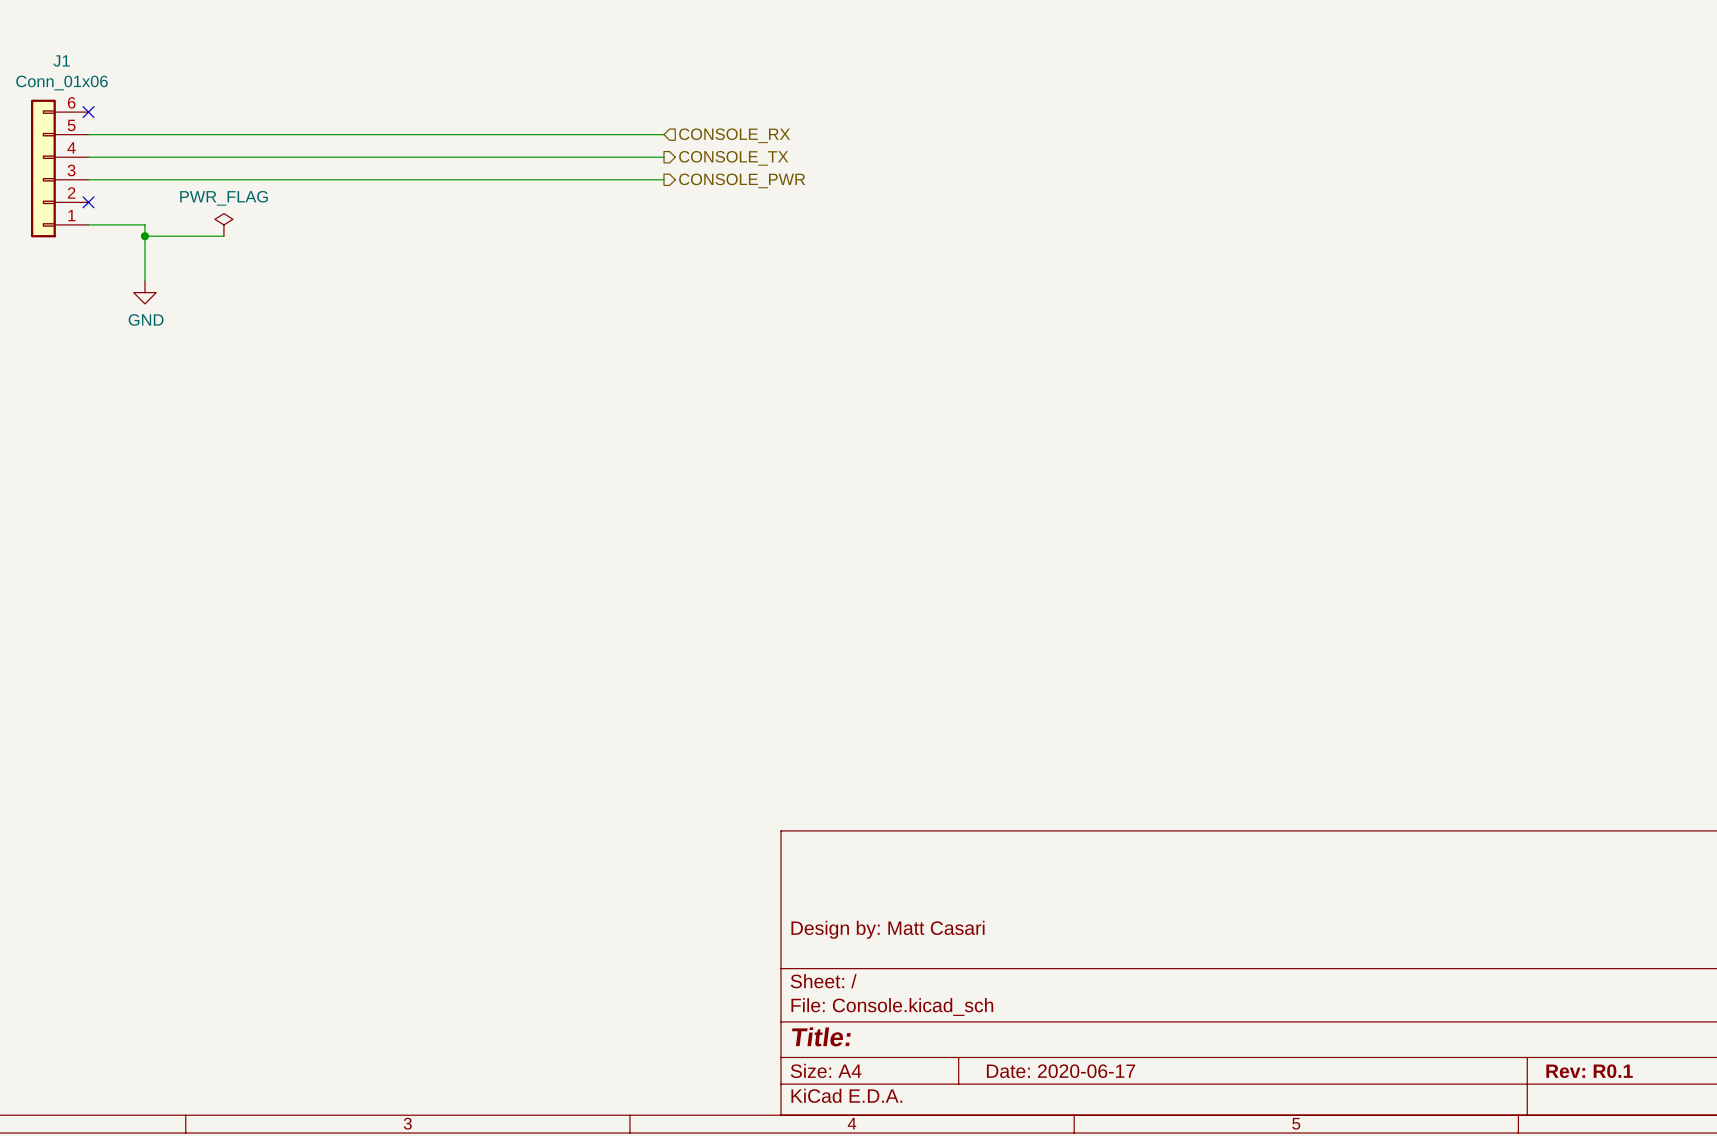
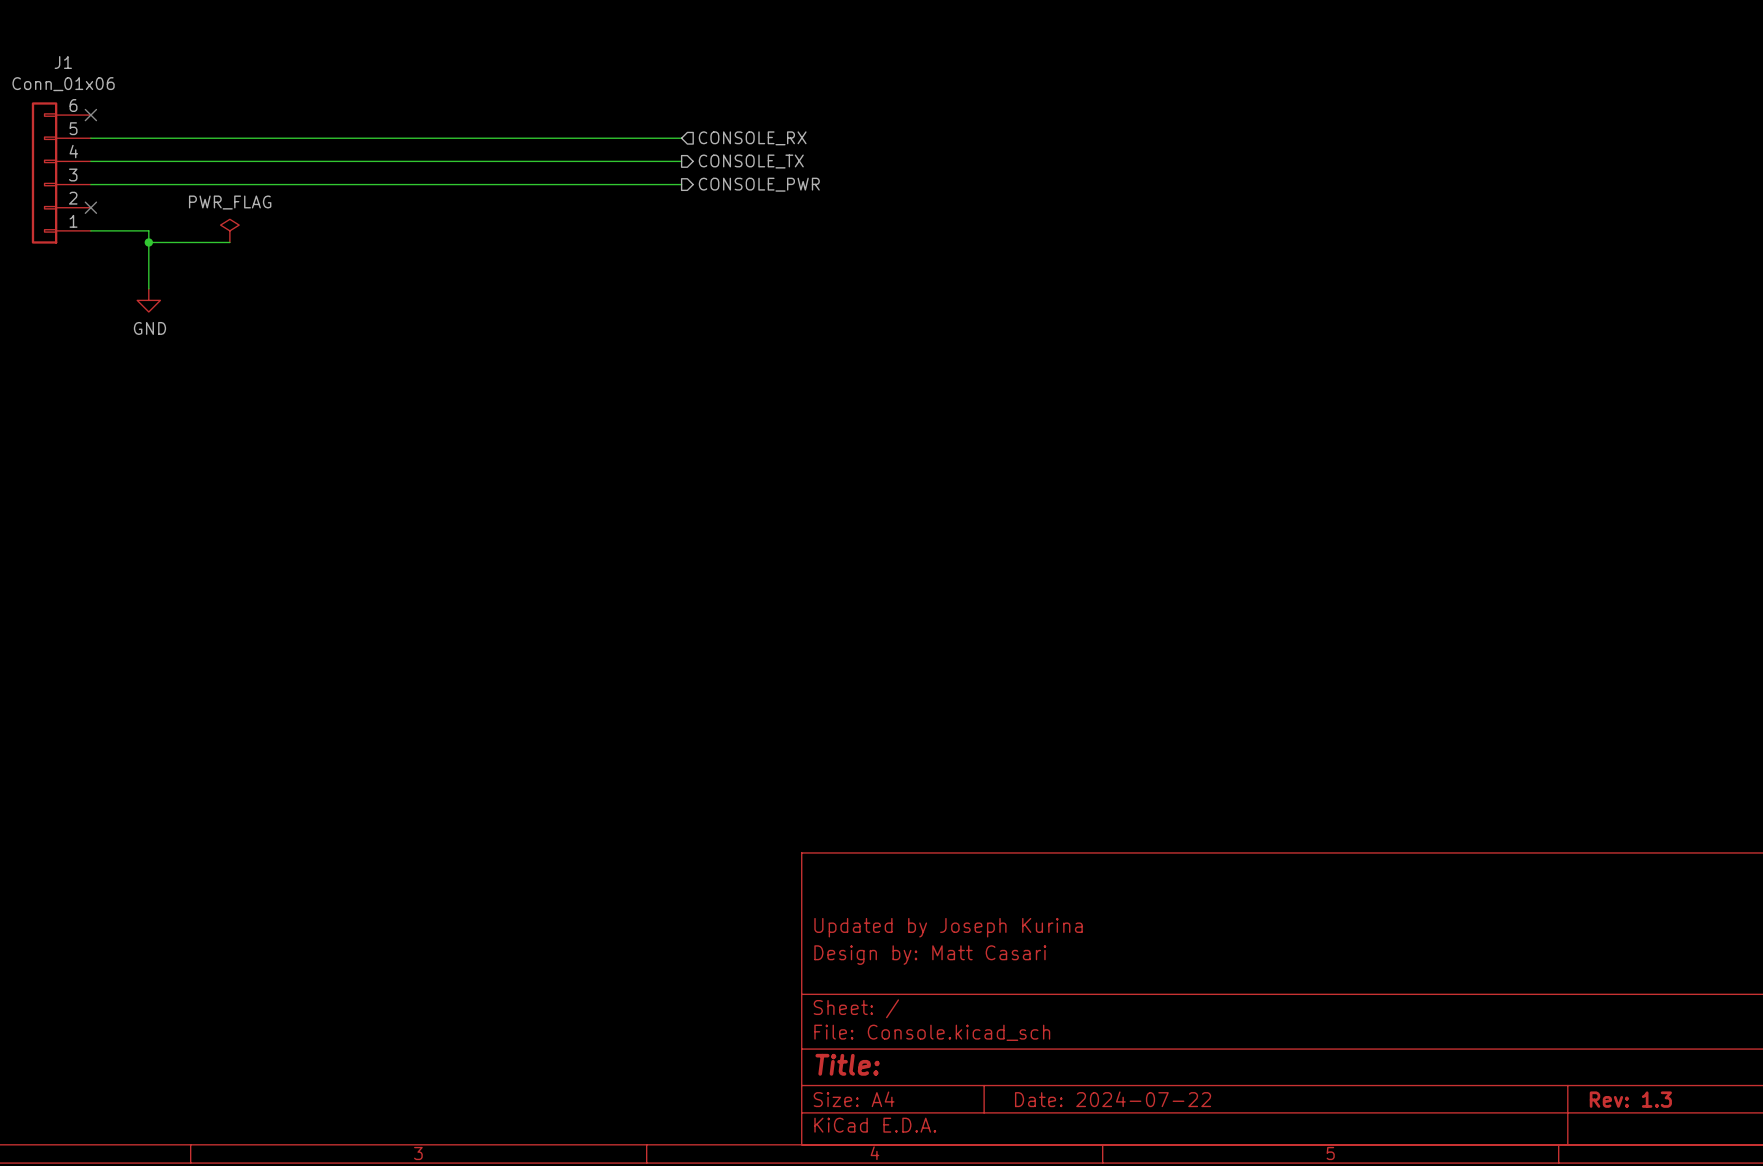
title block: none -> Updated by Joseph Kurina (948, 927)
title block: Date: 2020-06-17 (1061, 1071) -> Date: 2024-07-22 (1113, 1099)
title block: Rev: R0.1 (1589, 1071) -> Rev: 1.3 (1630, 1099)

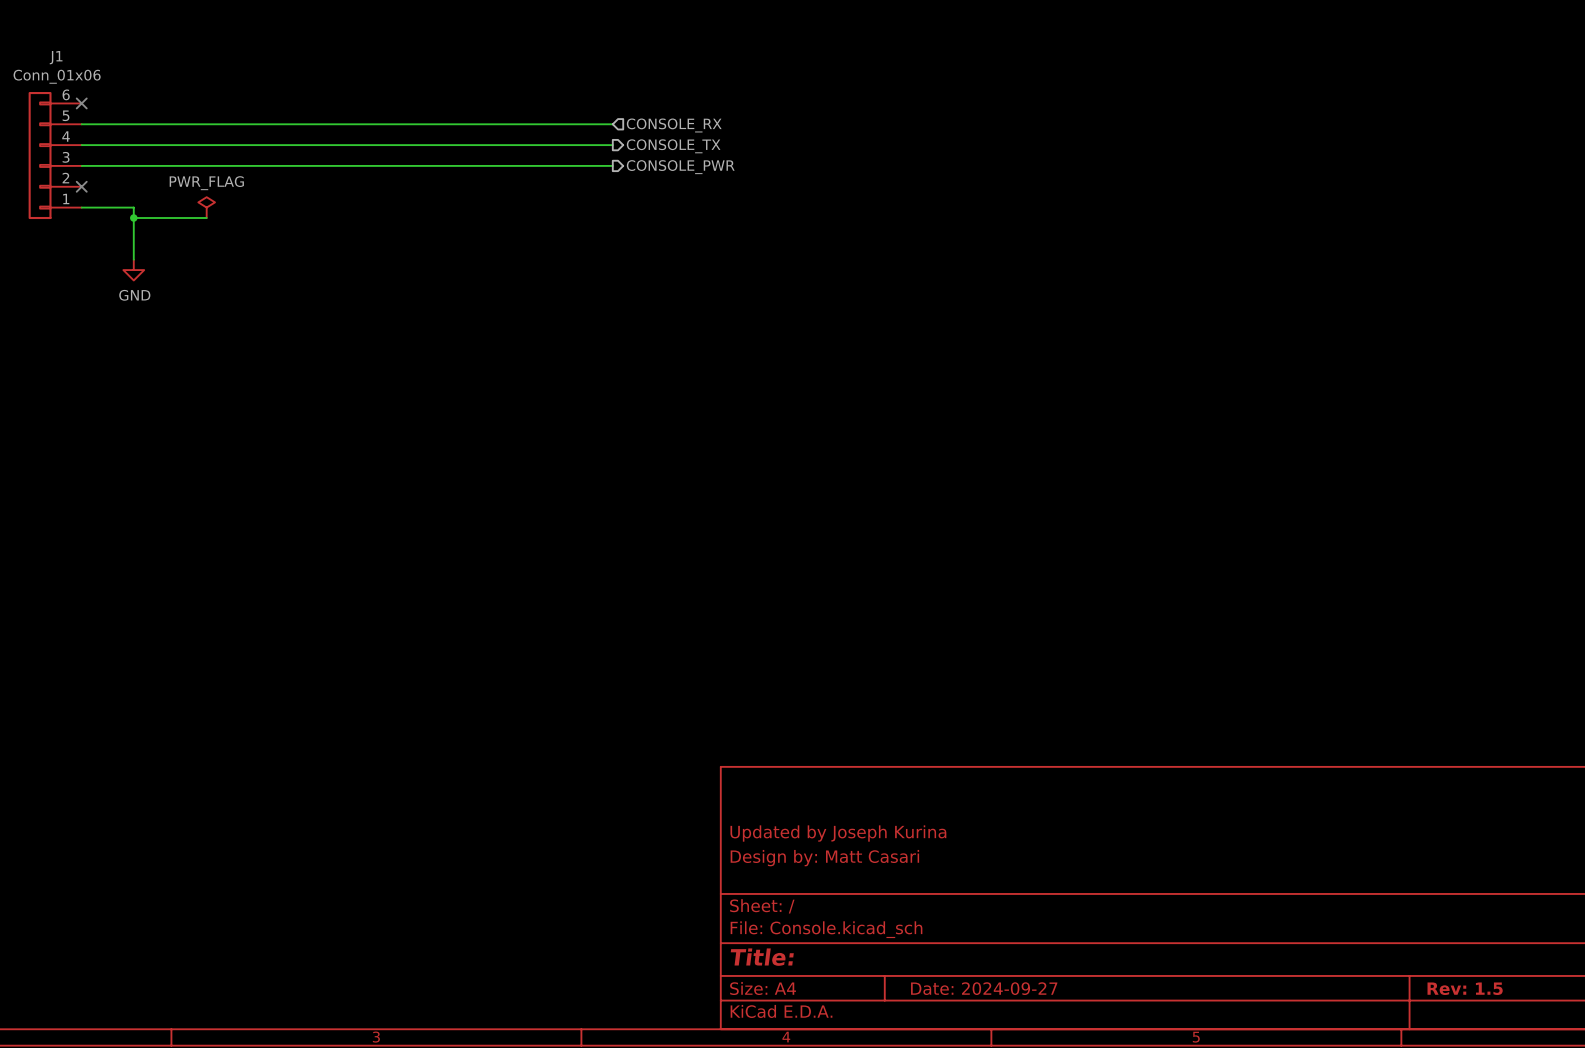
title block: Date: 2024-07-22 (1113, 1099) -> Date: 2024-09-27 (984, 988)
title block: Rev: 1.3 (1630, 1099) -> Rev: 1.5 (1465, 988)

